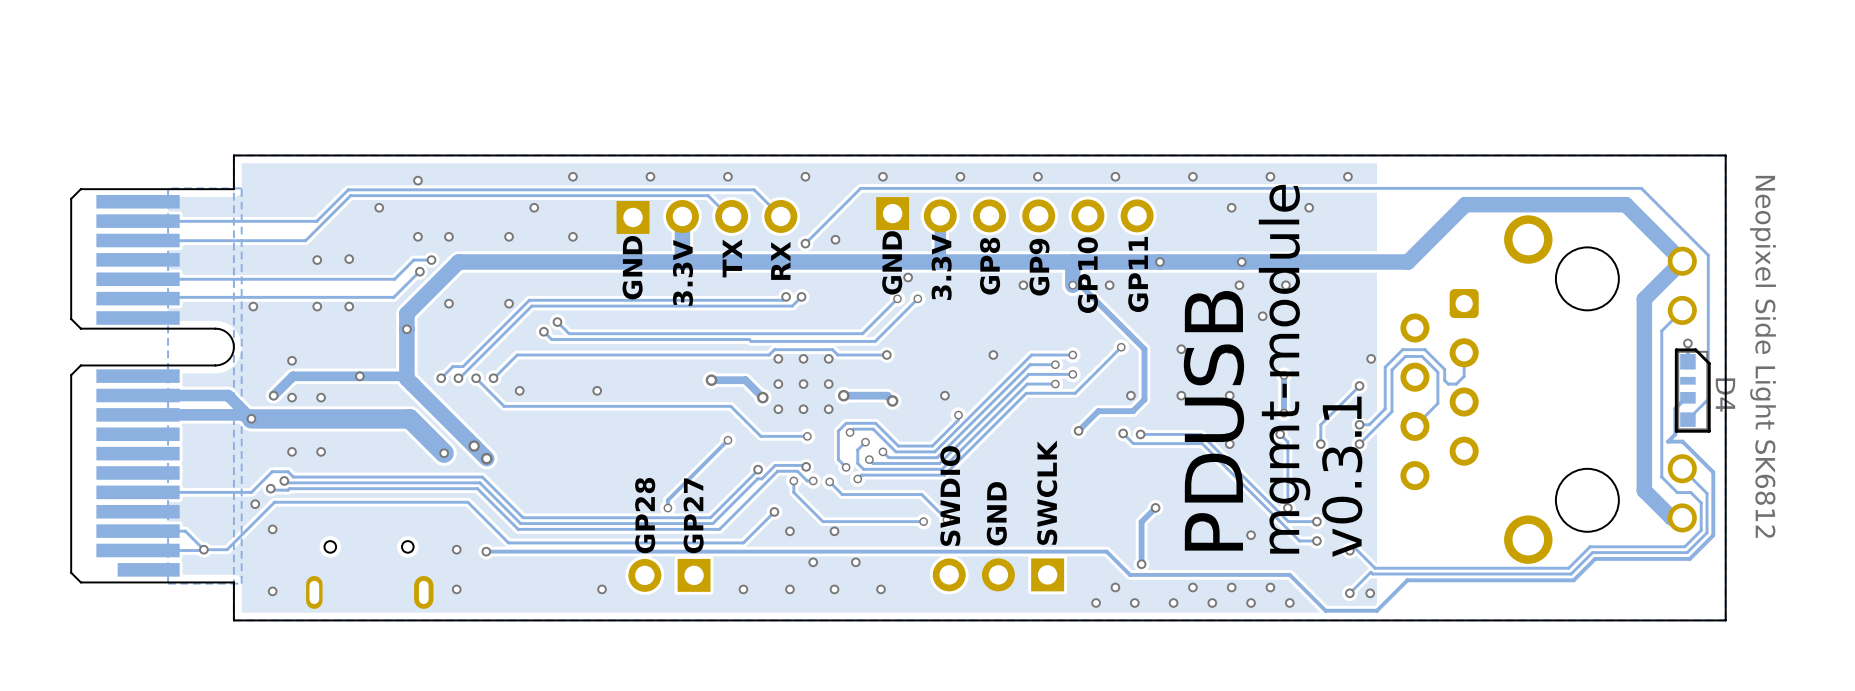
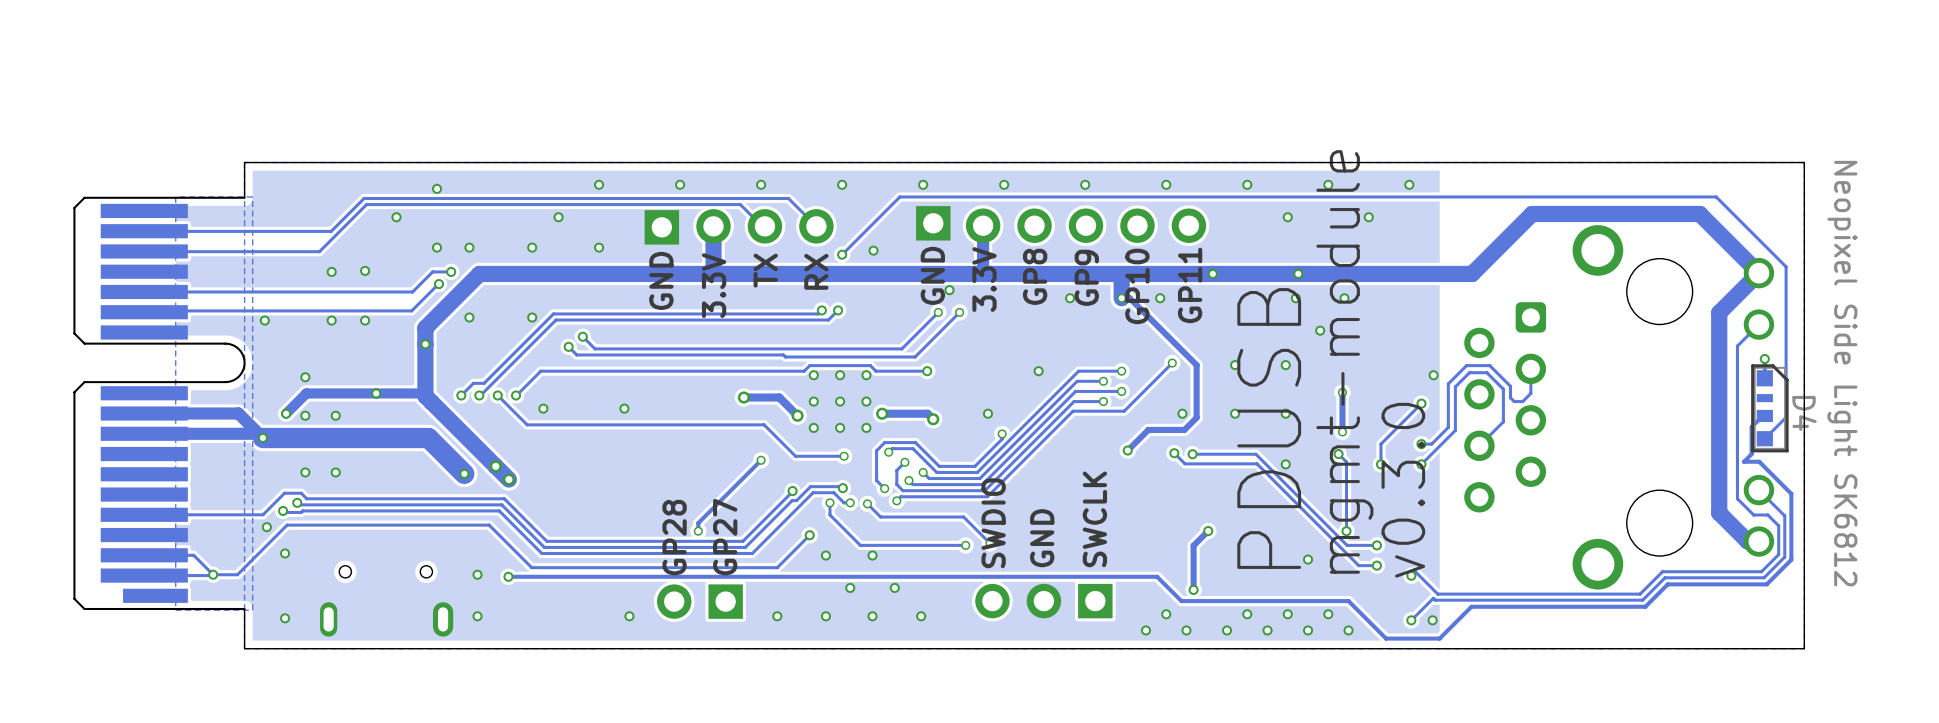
text: v0.3.1 (1342, 476) -> v0.3.0 (1403, 490)

